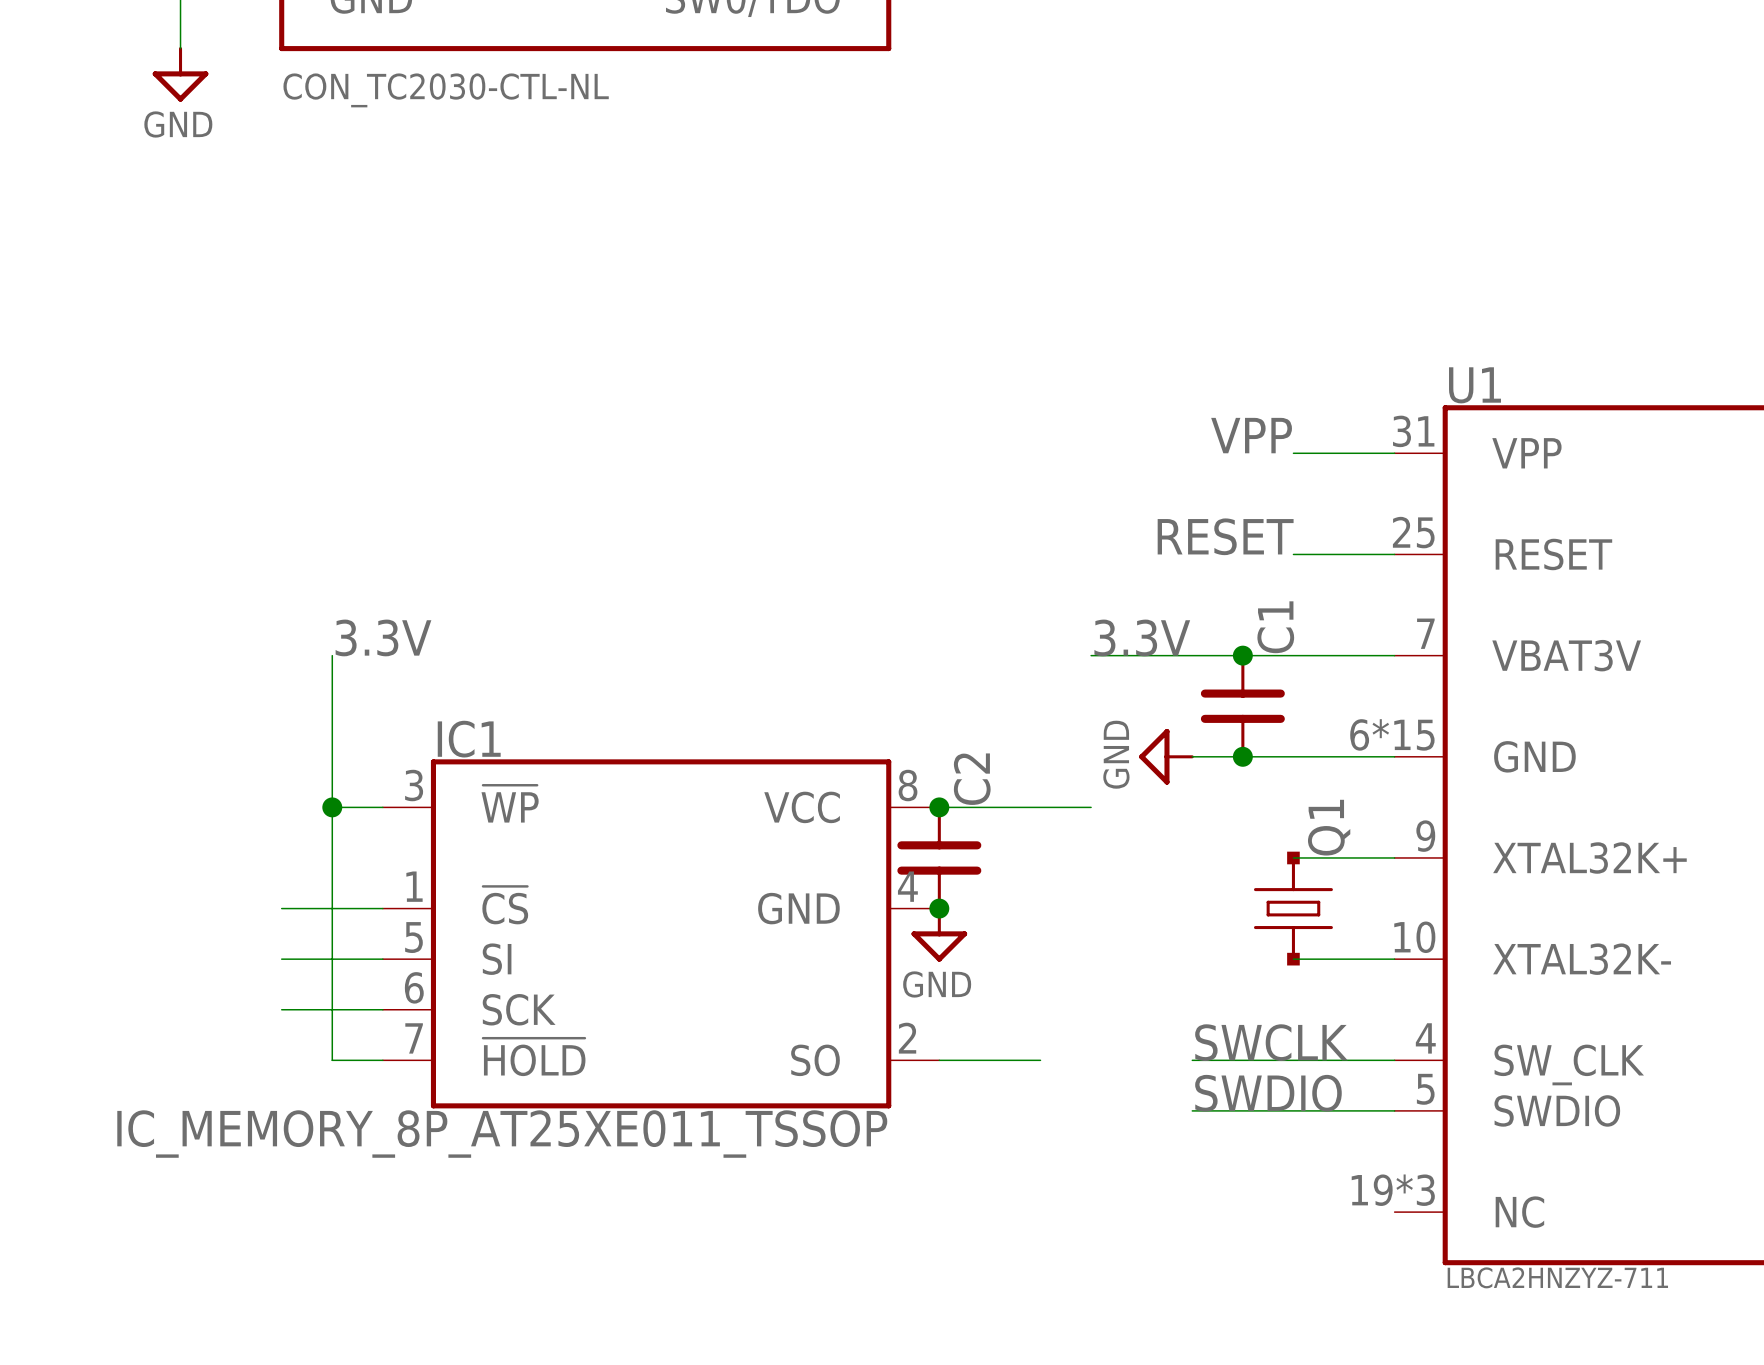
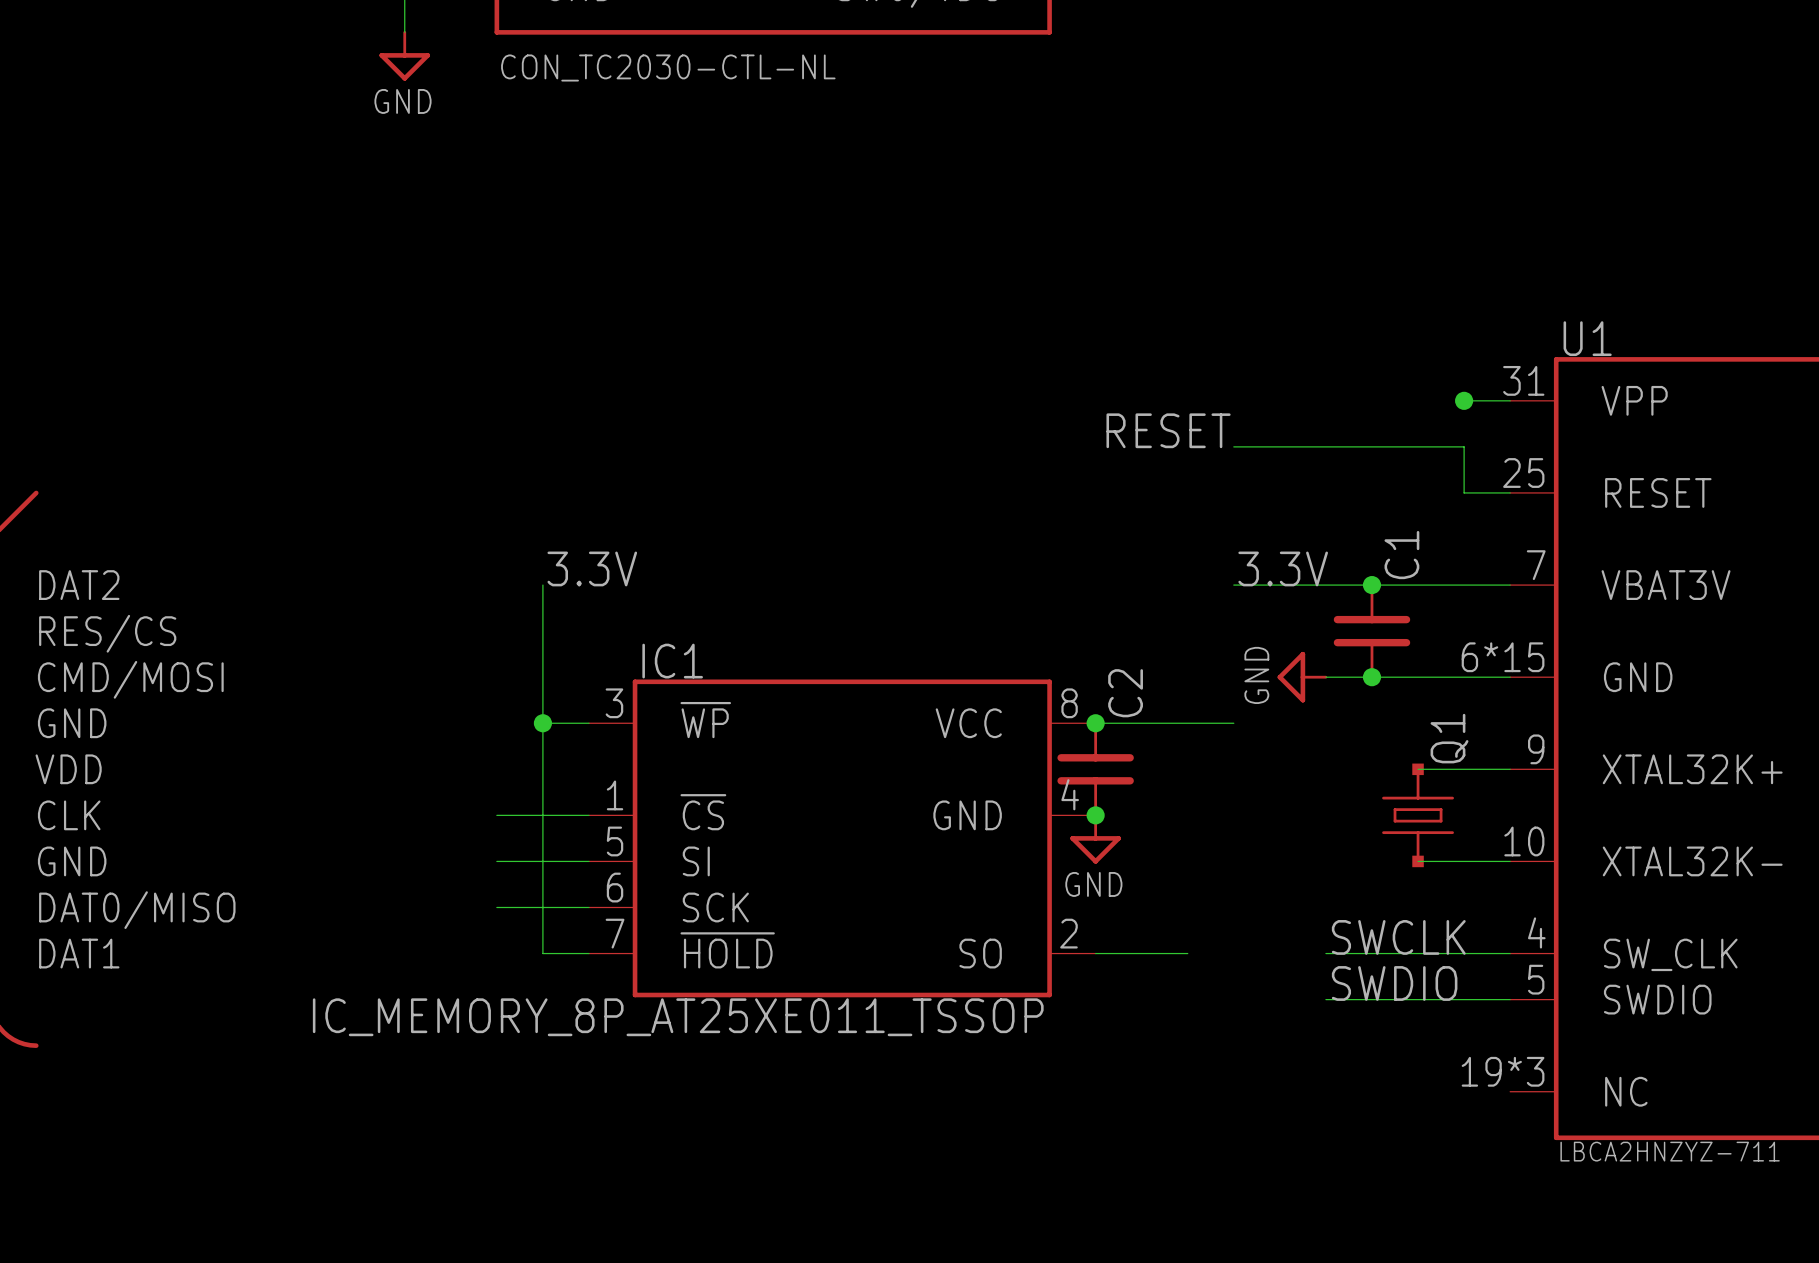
label: VPP (1251, 435) -> none
wire: (1293, 453) (1344, 453) -> none
junction: none -> (1464, 400)
label position: RESET (1225, 536) -> RESET (1168, 430)
wire: (1293, 554) (1344, 554) -> (1233, 446) (1464, 446) (1464, 492)

